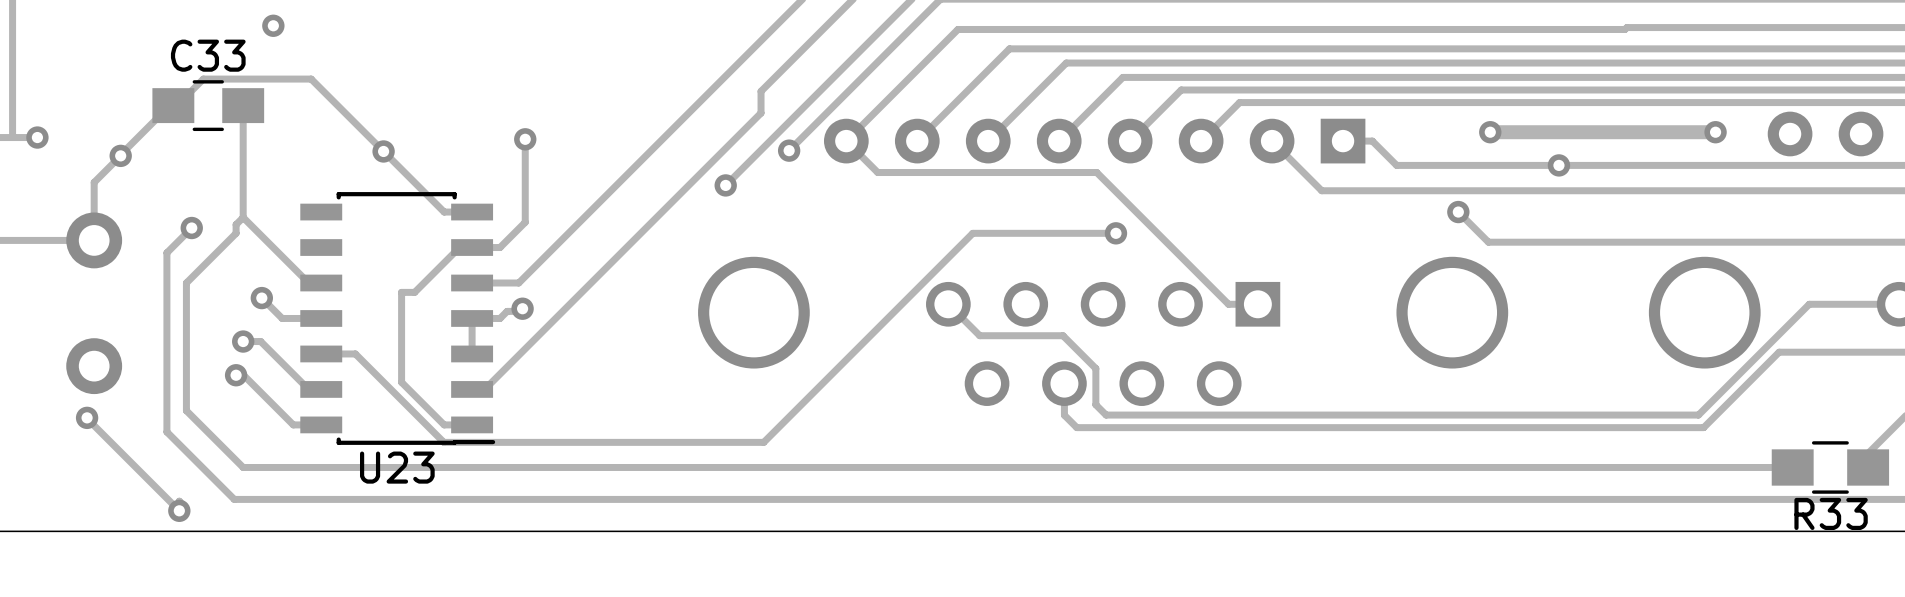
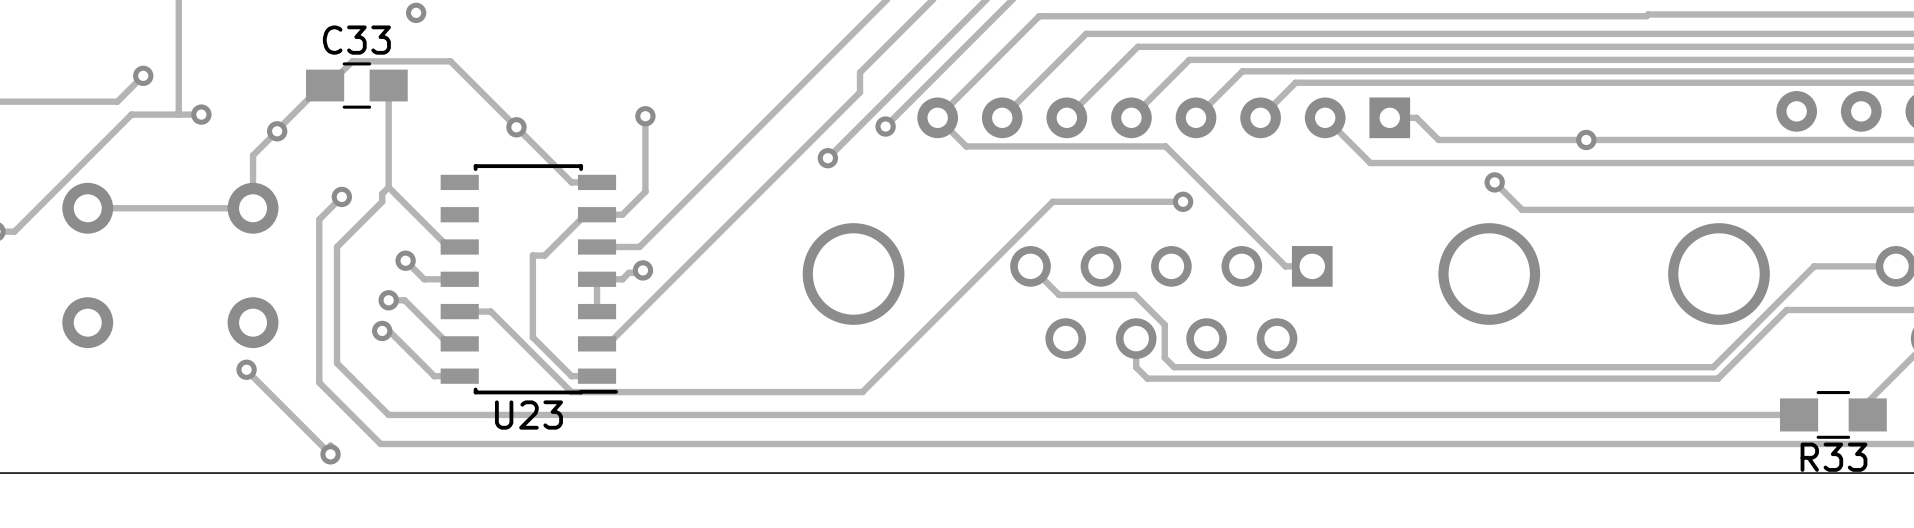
via: (1490, 132) -> none
track: (1715, 132) (1490, 132) -> none
via: (1715, 132) -> none

